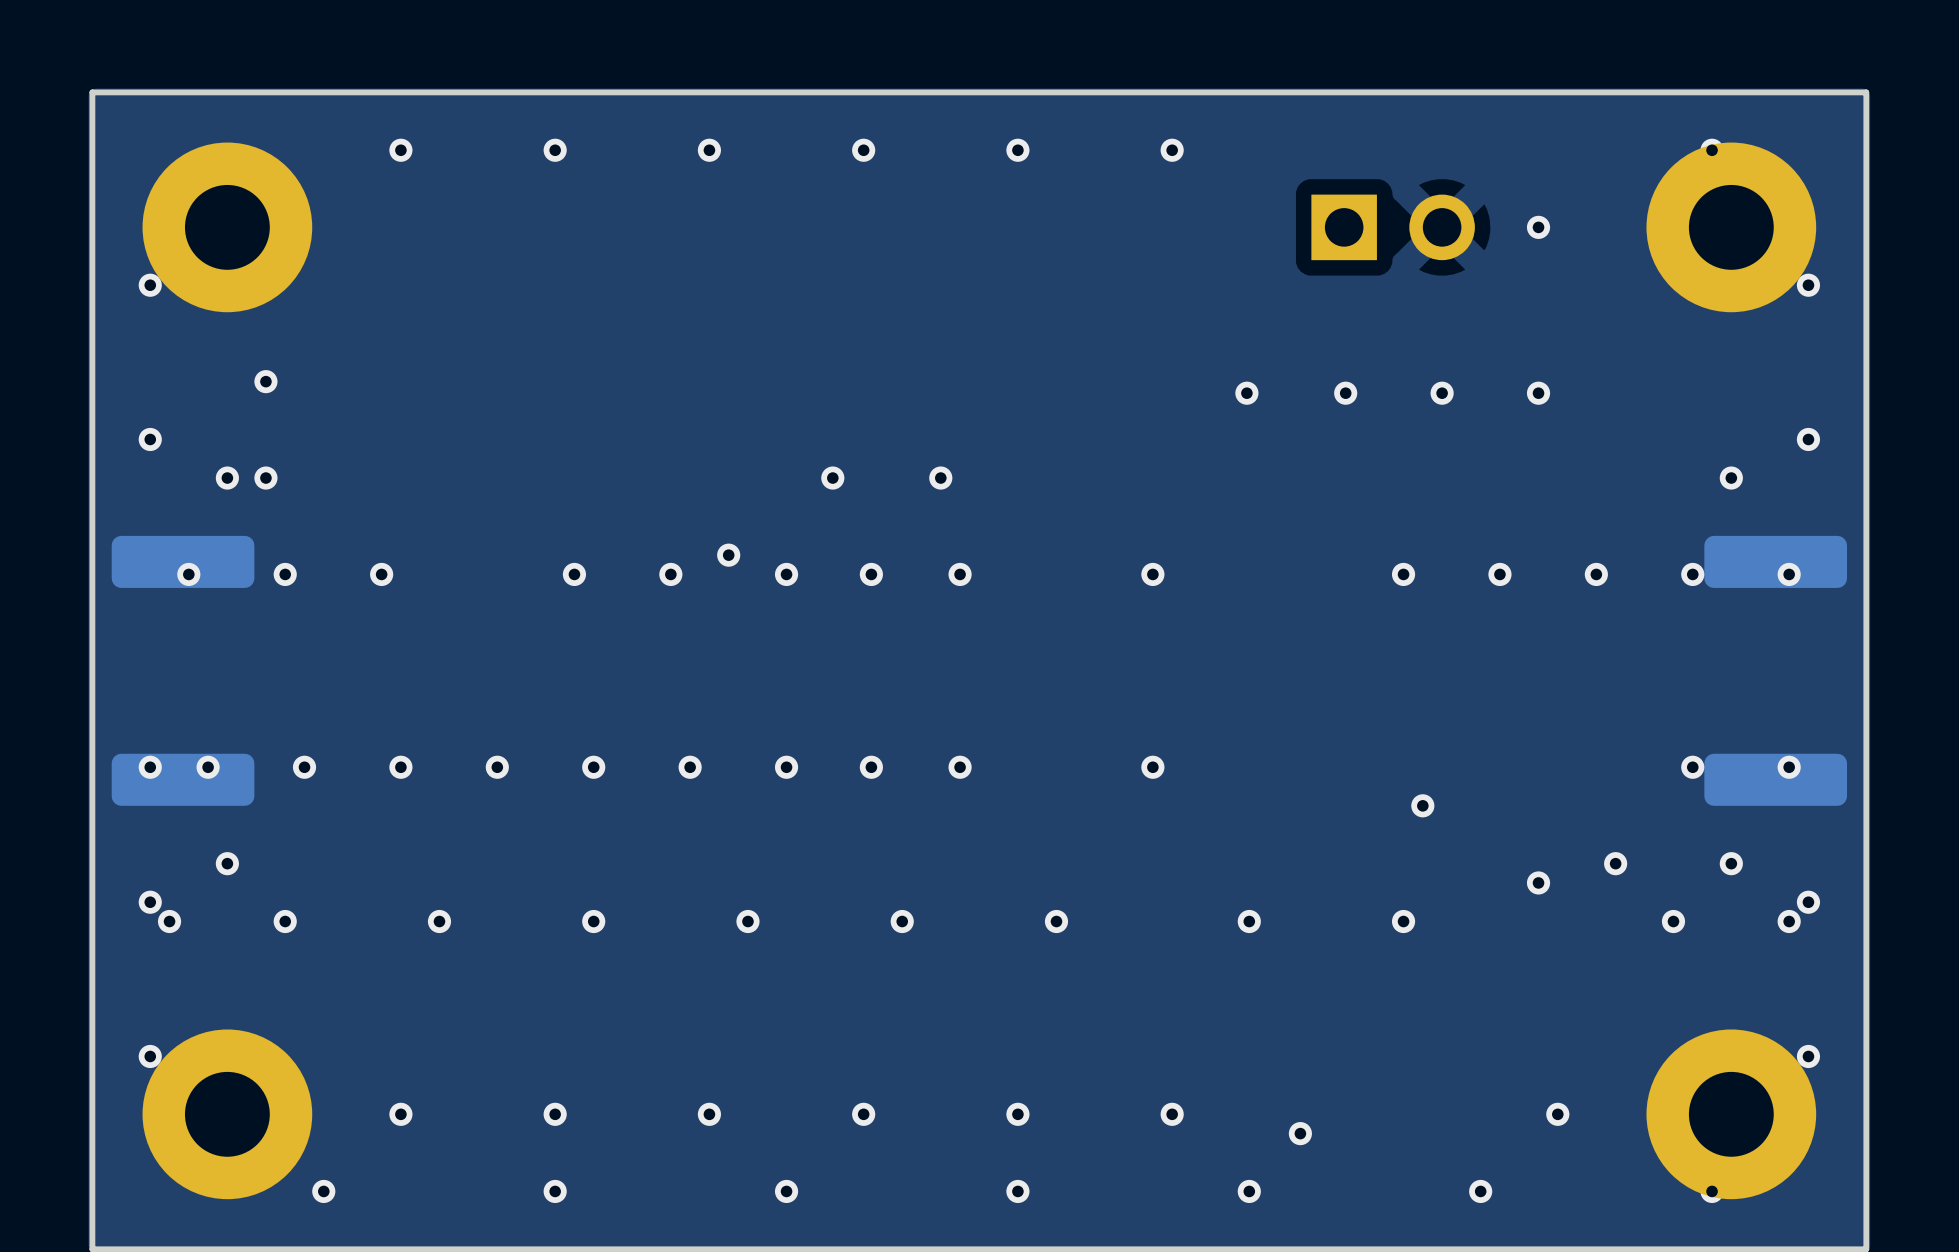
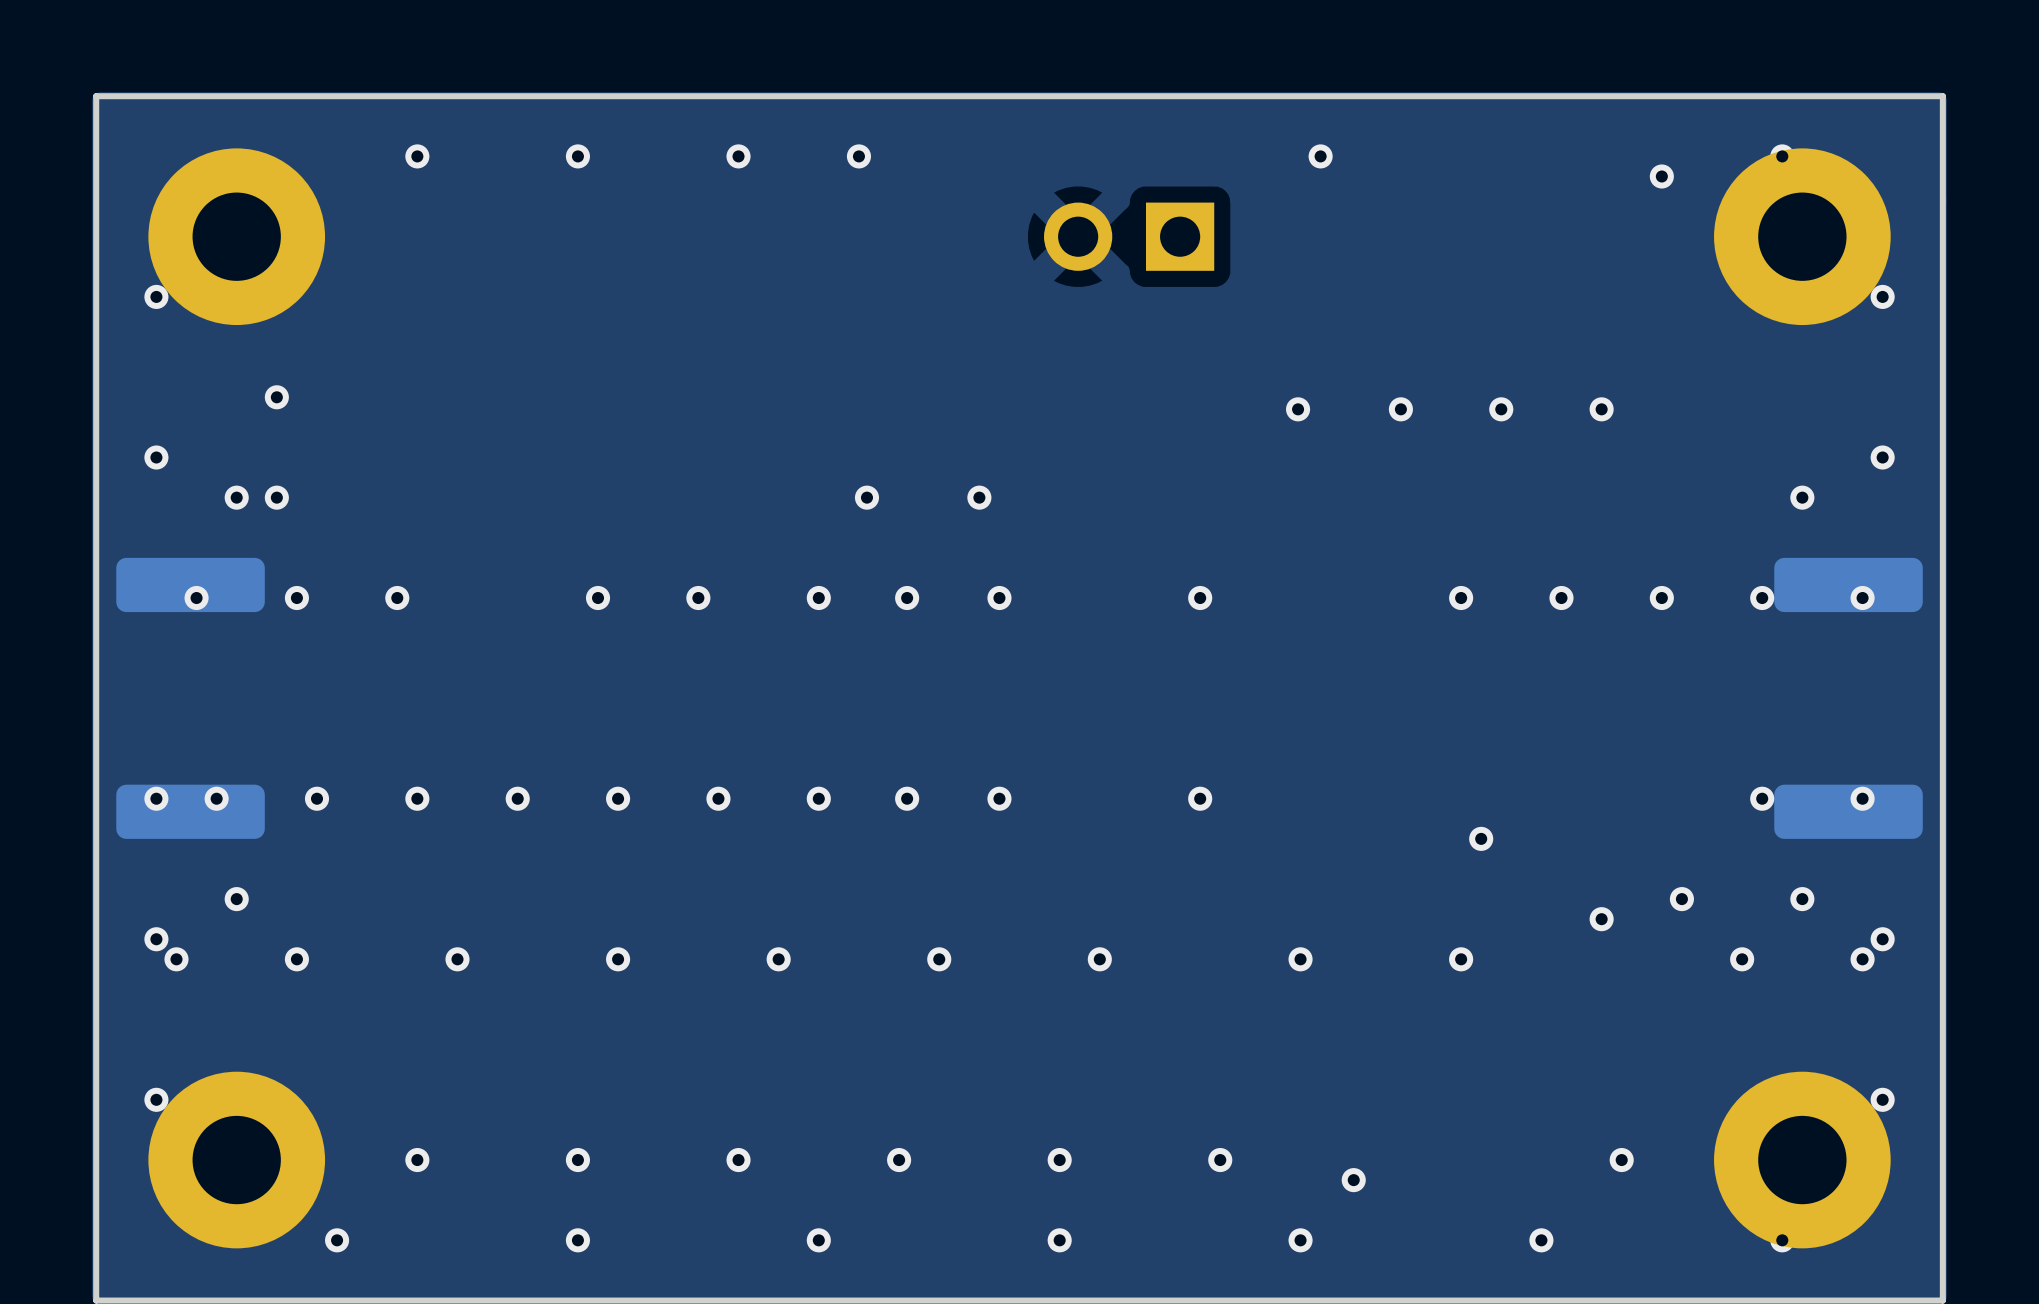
via position: (863, 150) -> (858, 156)
via: (1017, 150) -> none
via position: (1172, 150) -> (1320, 156)
part rotation: 0° (1393, 227) -> 180° (1129, 236)
part position: (1393, 227) -> (1129, 236)
via position: (1538, 227) -> (1661, 176)
via: (728, 555) -> none

